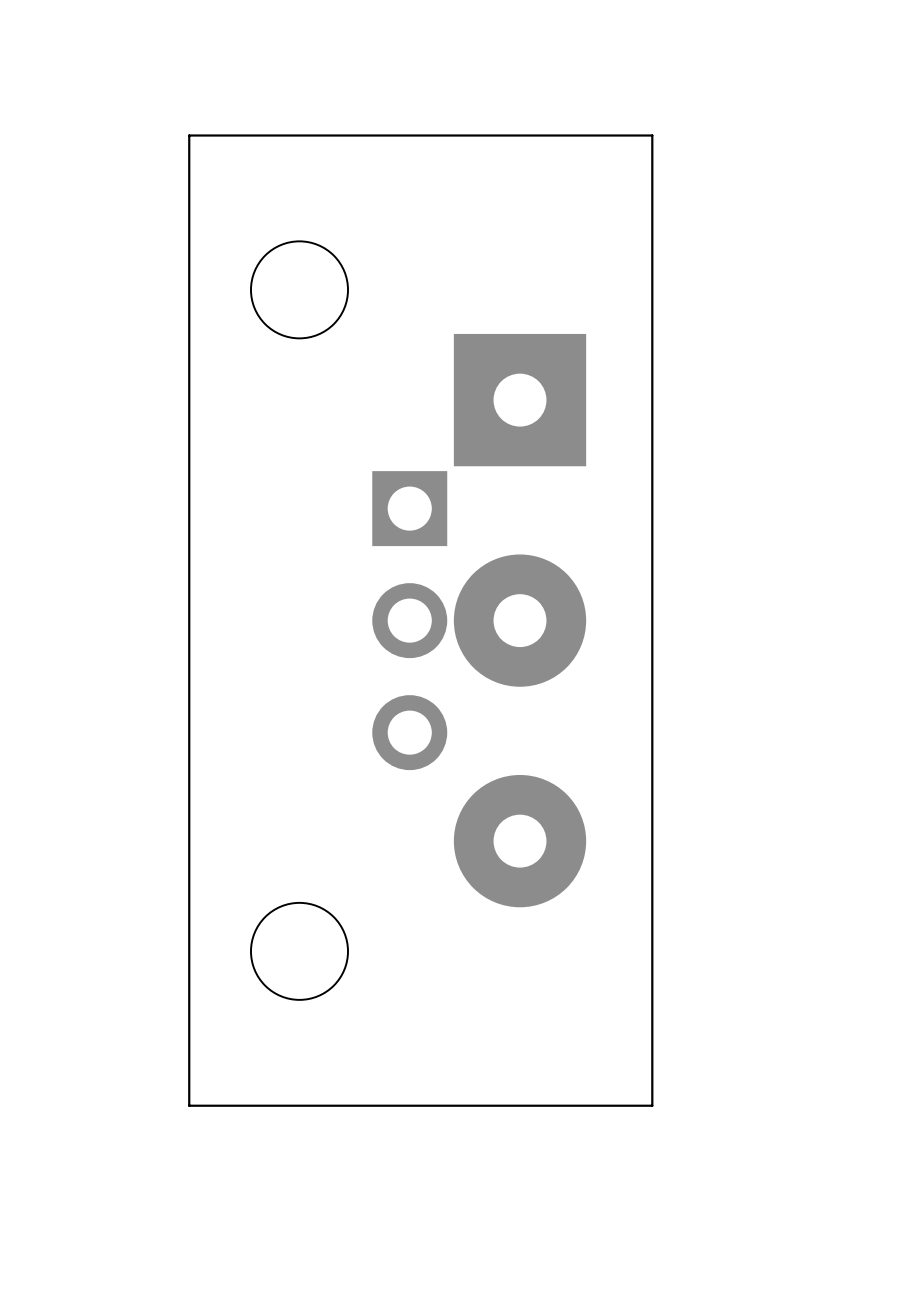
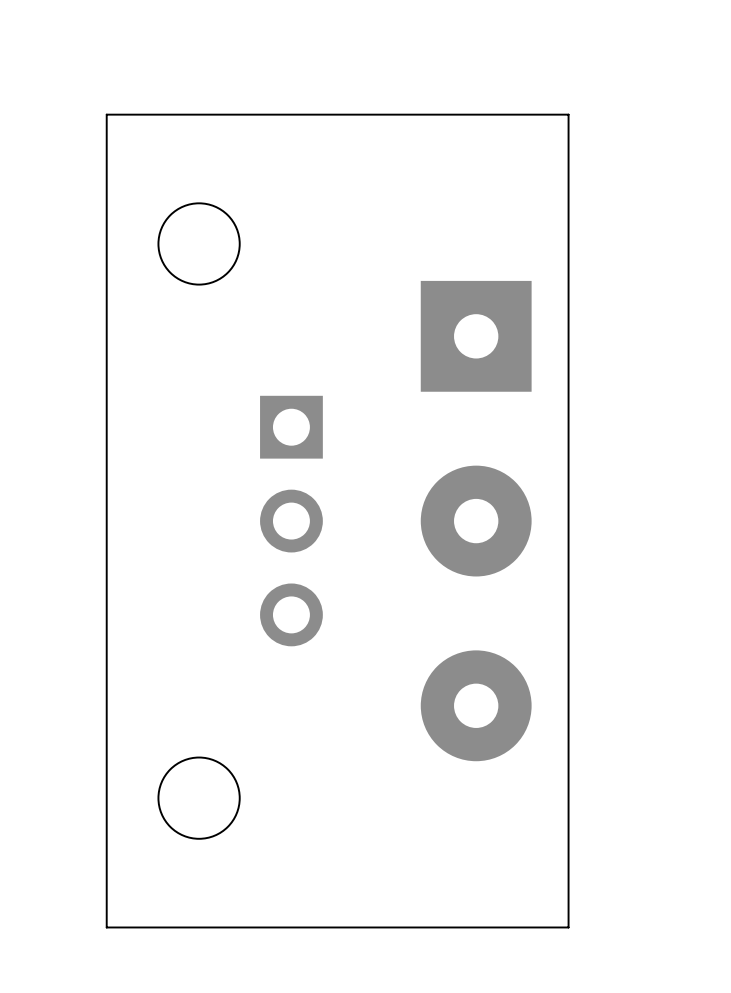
board edge: (652, 135) (652, 1105) -> (494, 114) (568, 114) (568, 927) (494, 927)
part position: (520, 620) -> (476, 521)

